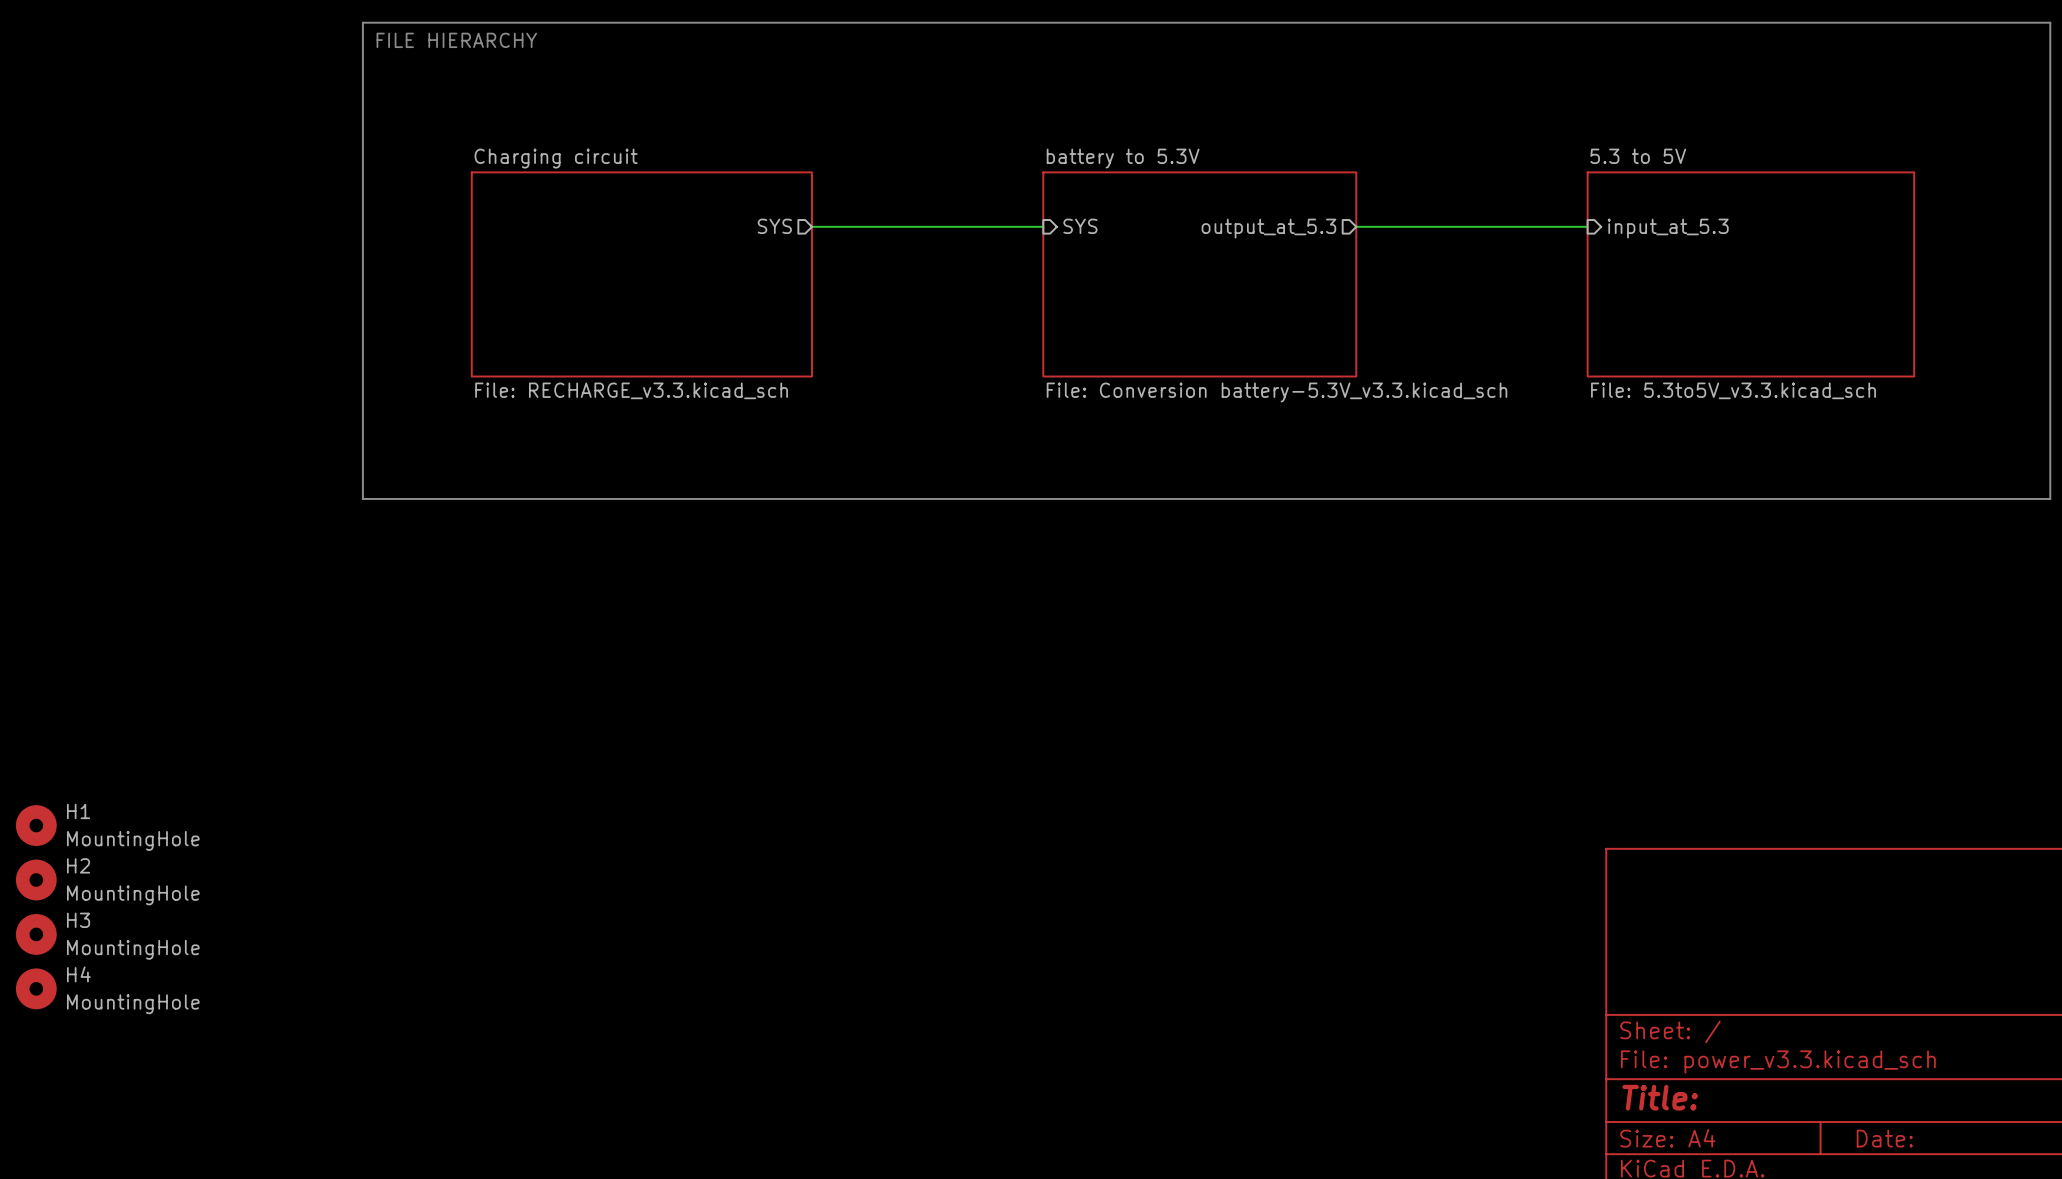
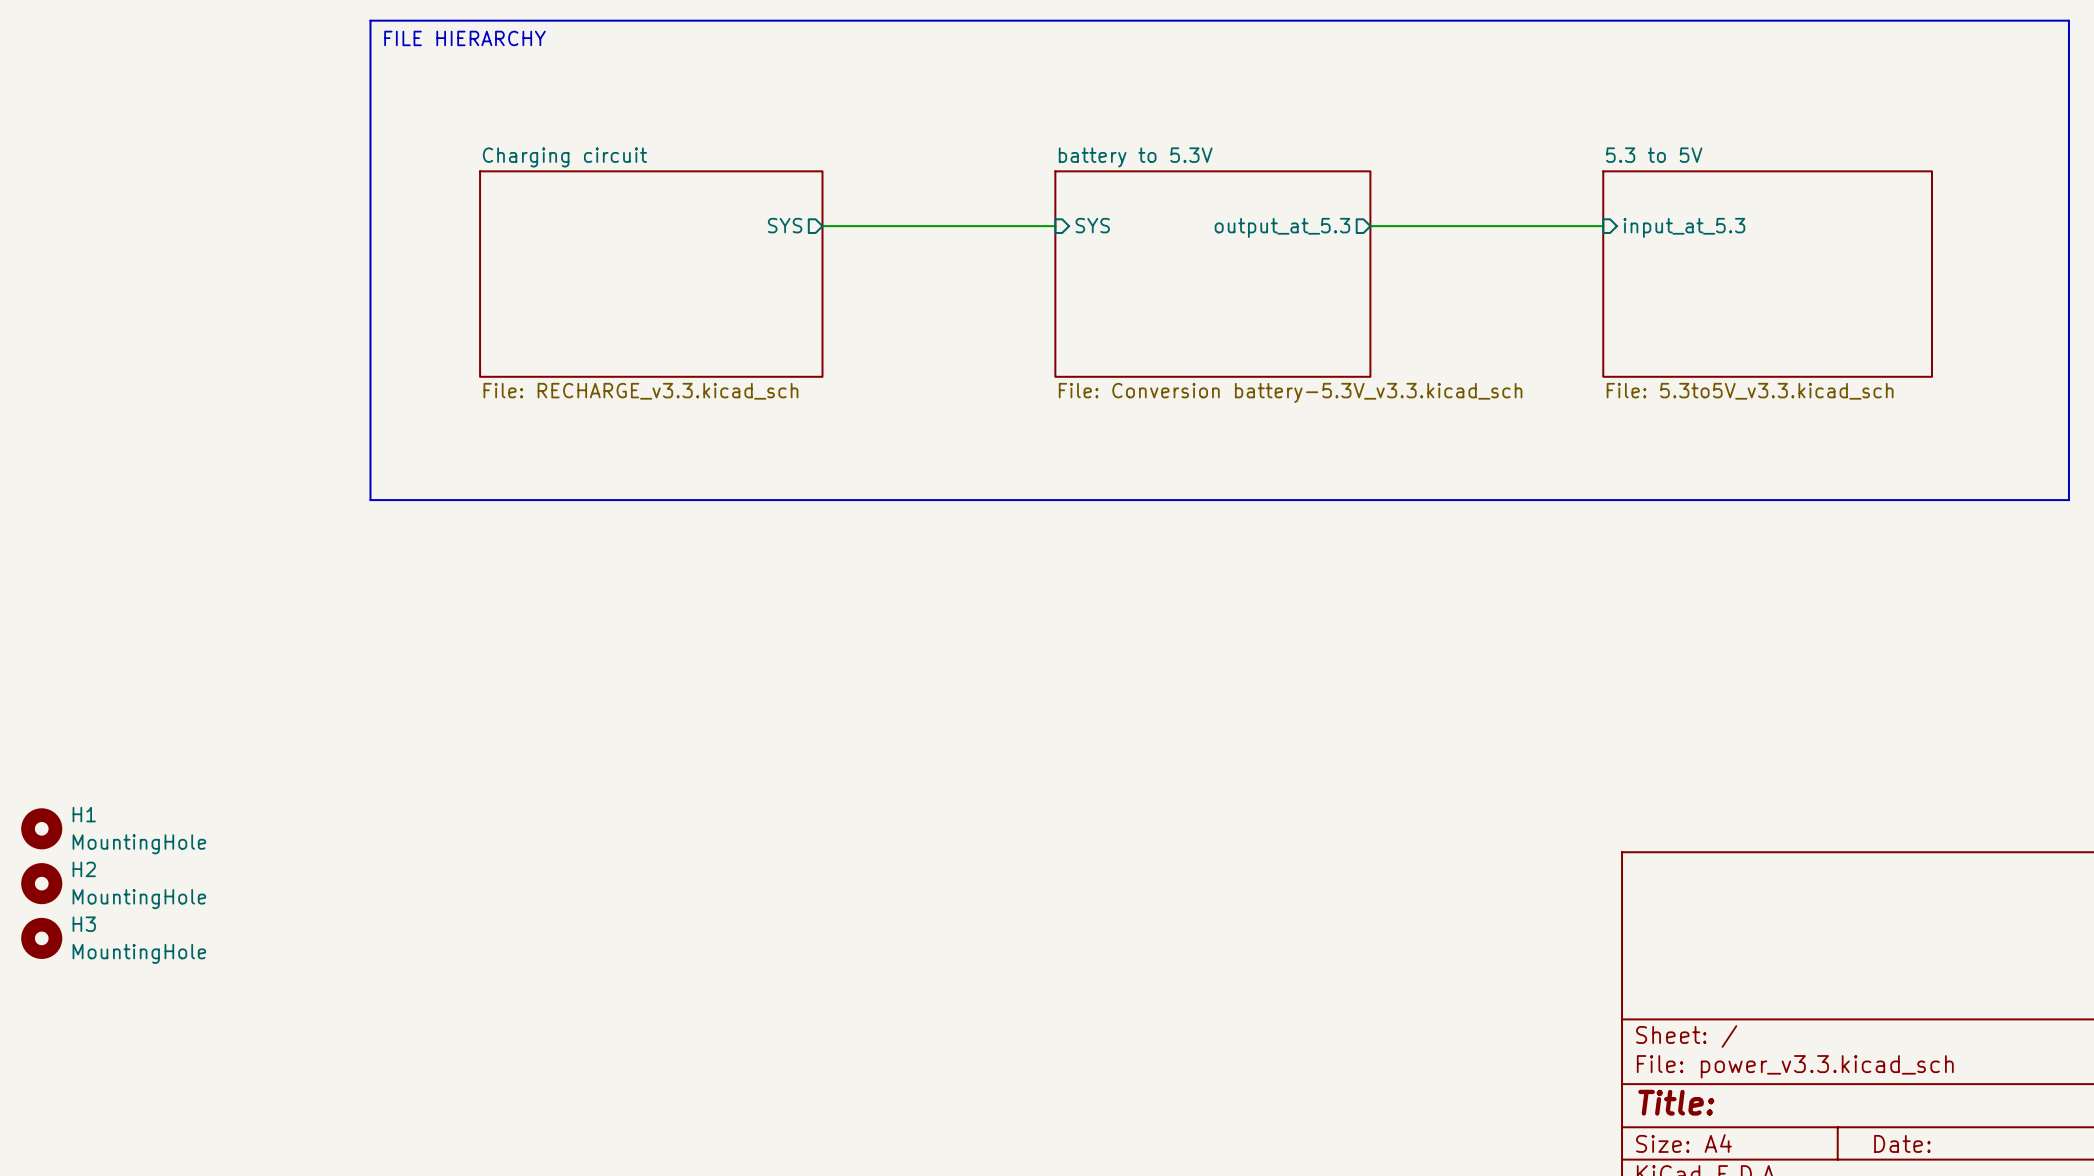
H4: MountingHole (36, 988) -> none

